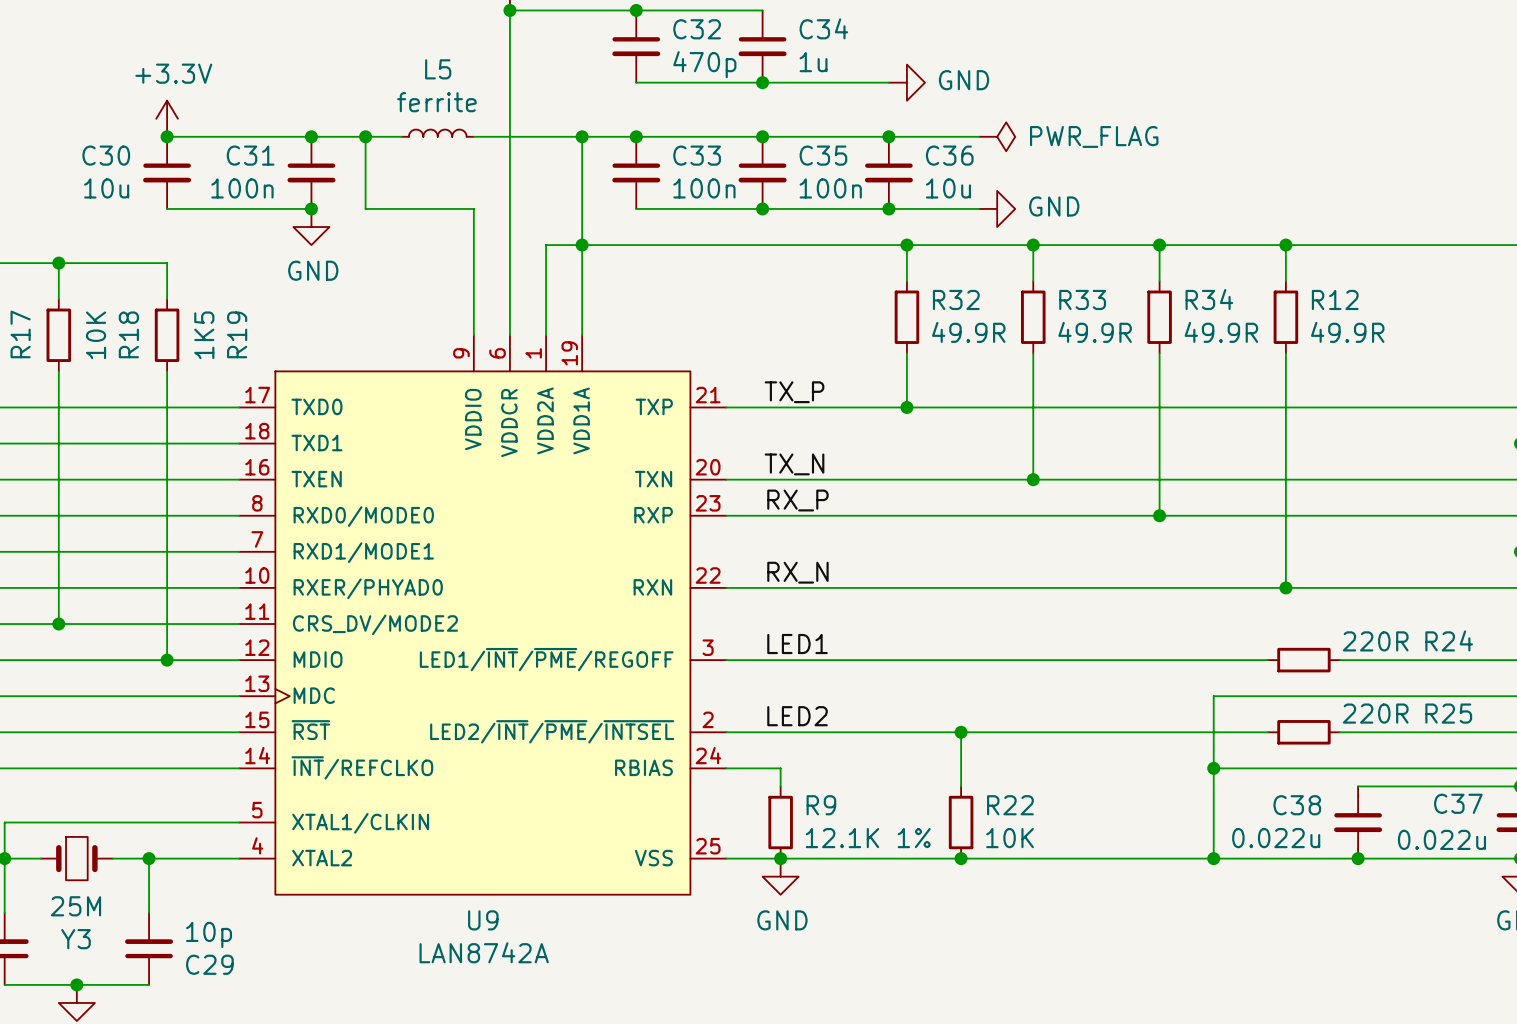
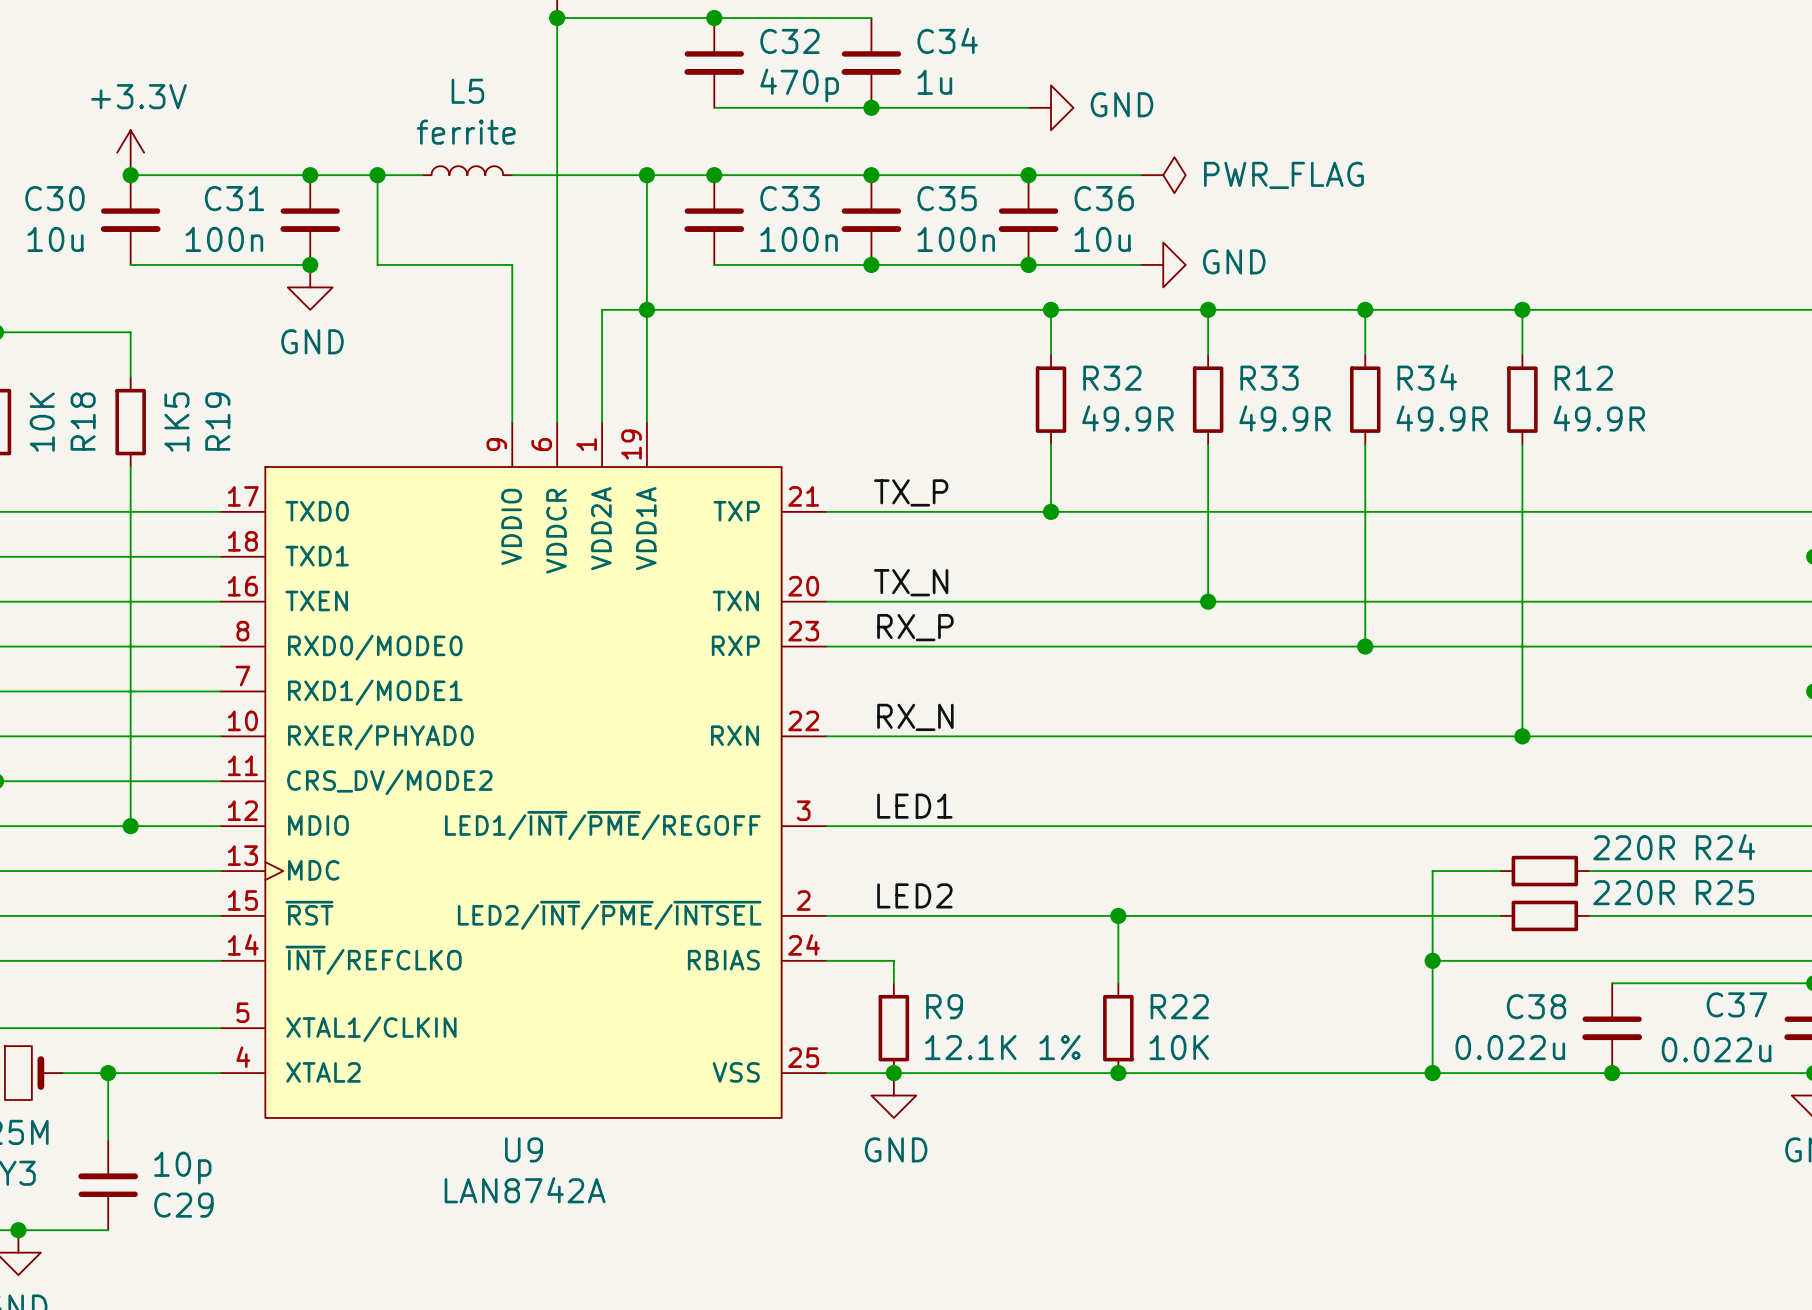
R24 position: (1303, 660) -> (1544, 871)
wire: (1267, 696) (1340, 696) -> (1499, 826) (1589, 826)

